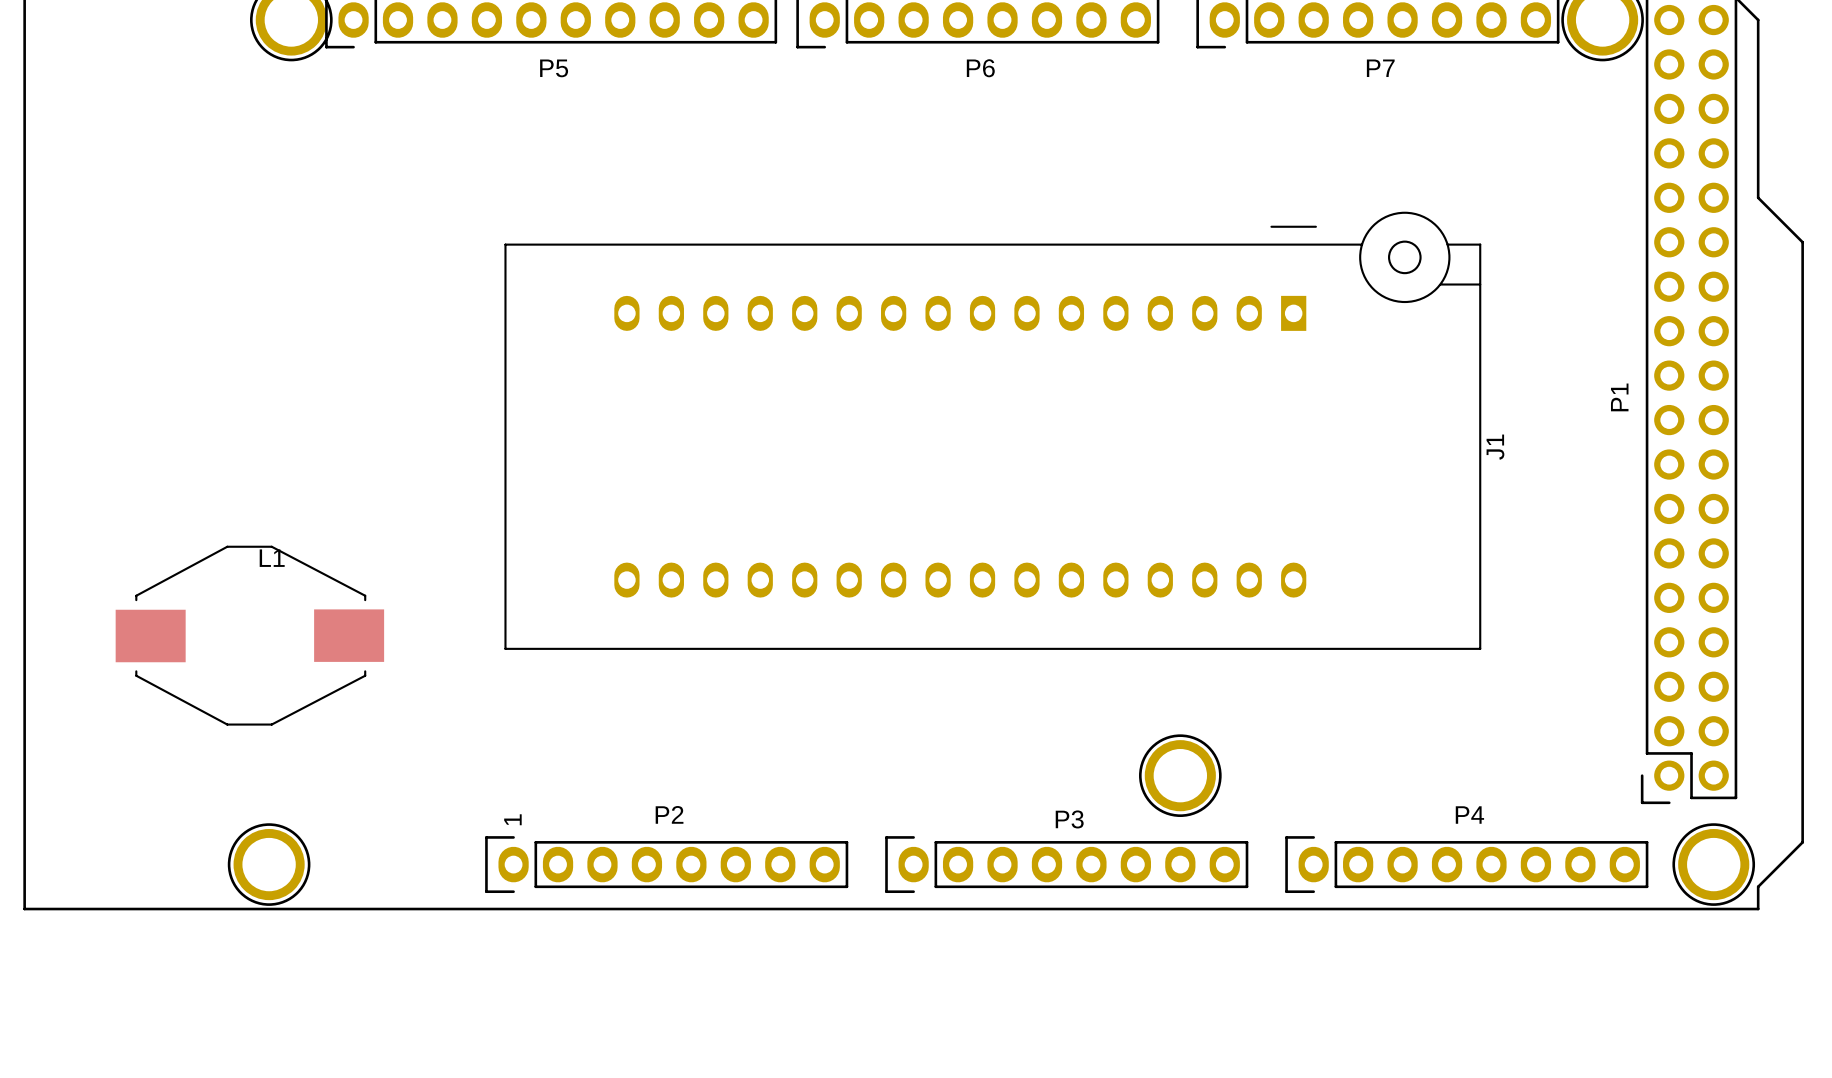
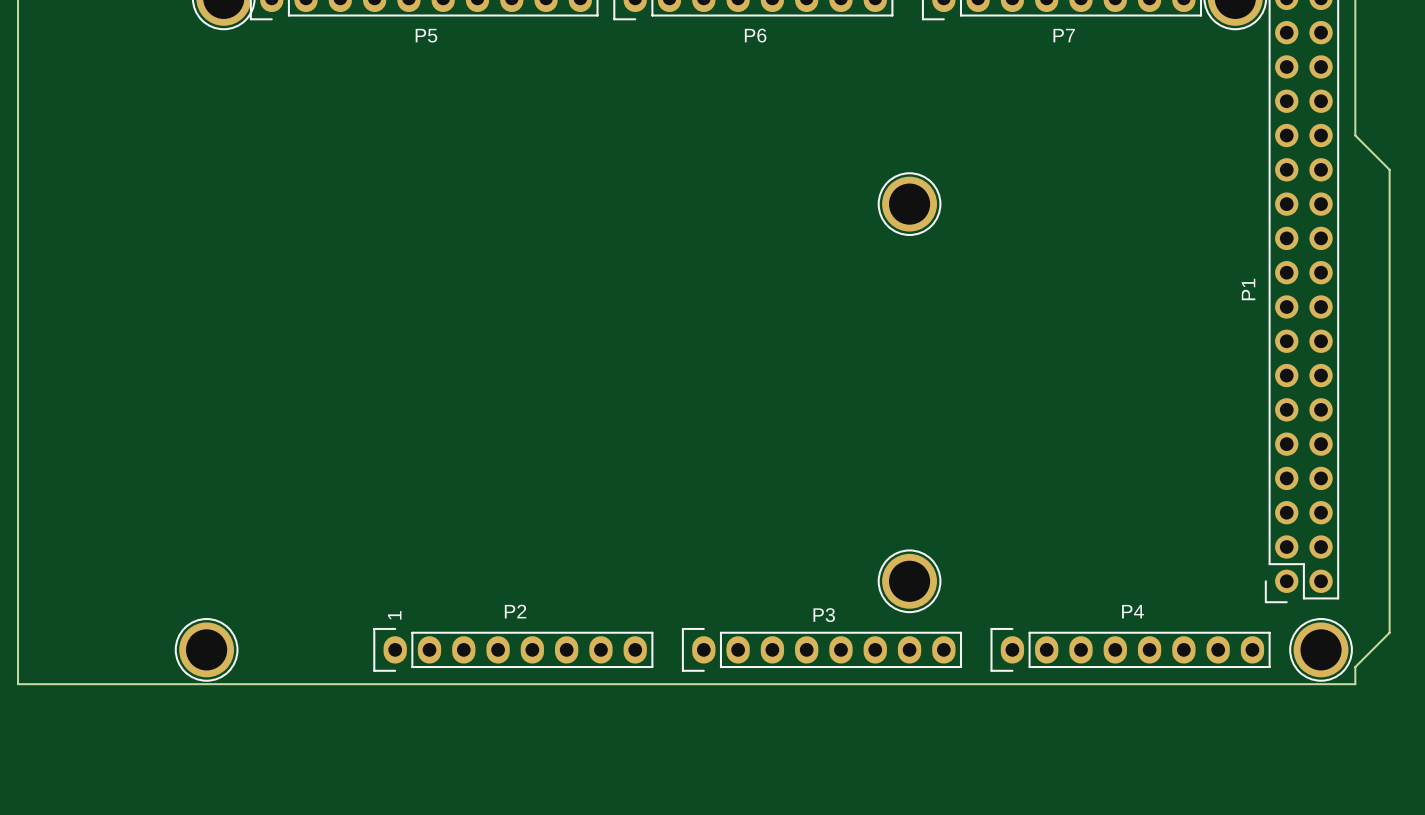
part: none -> (909, 204)
J1: (992, 430) -> none
L1: (249, 635) -> none

